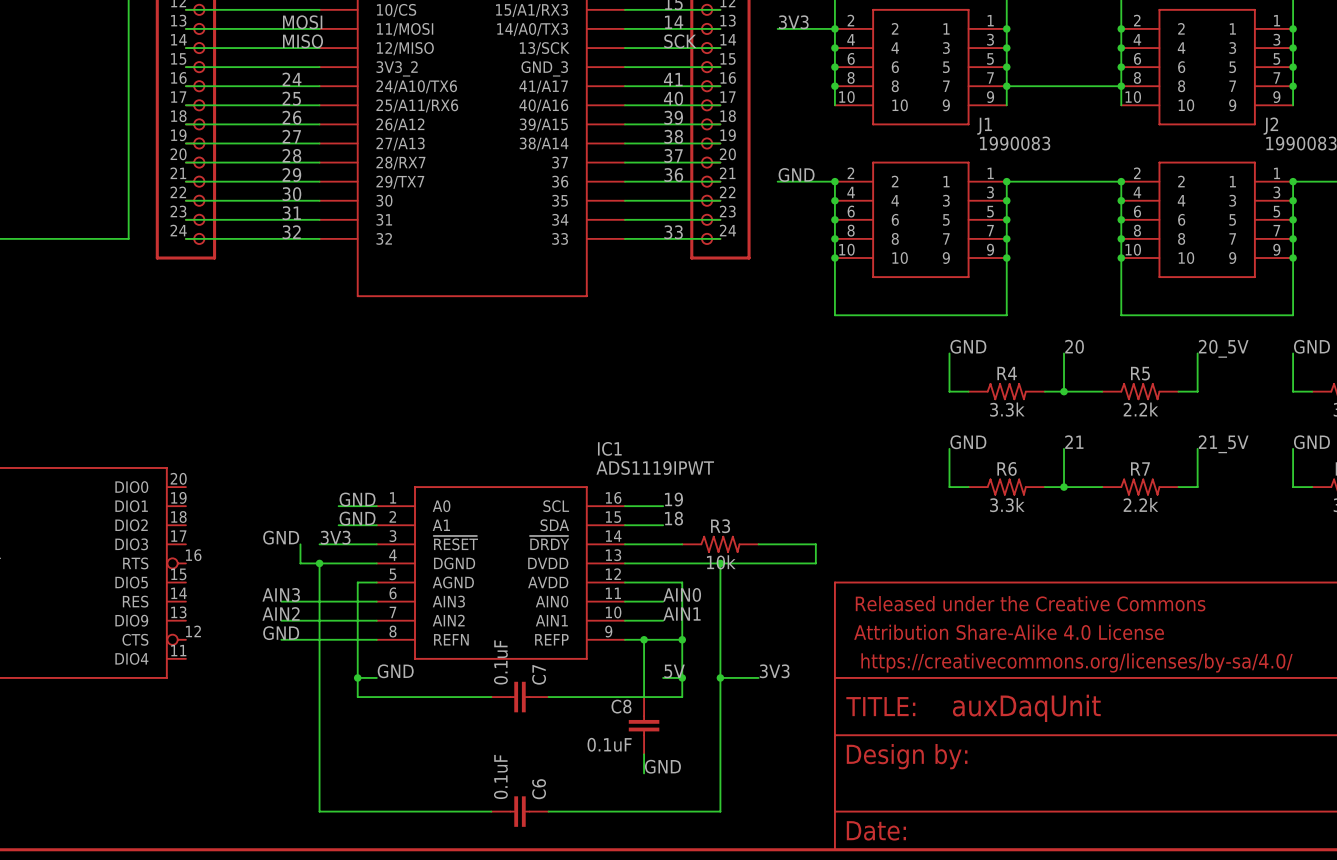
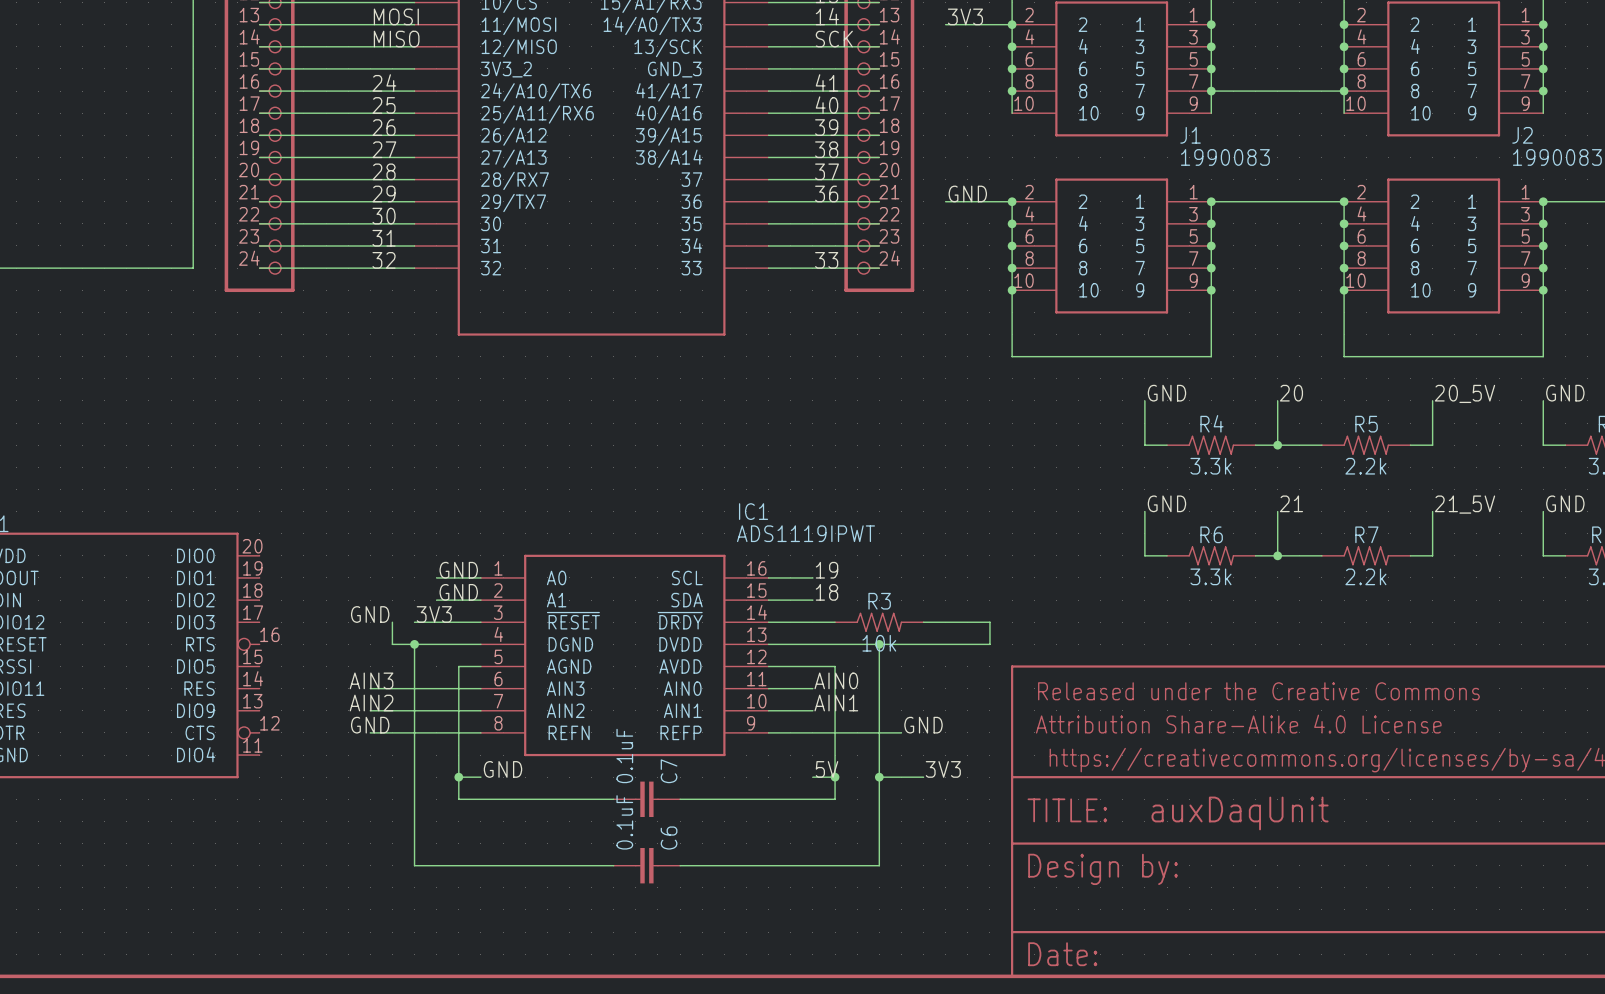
wire: (644, 639) (644, 697) -> none
junction: (644, 639) -> none
wire: none -> (835, 732) (901, 732)
junction: (682, 639) -> none
C8: 0.1uF (644, 725) -> none
wire: (319, 754) (319, 811) (491, 811) -> (414, 865) (613, 865)
wire: (644, 754) (644, 773) -> none
wire: (720, 754) (720, 811) (548, 811) -> (879, 865) (680, 865)
label position: GND (662, 766) -> GND (923, 725)
C6 position: (519, 811) -> (646, 865)

